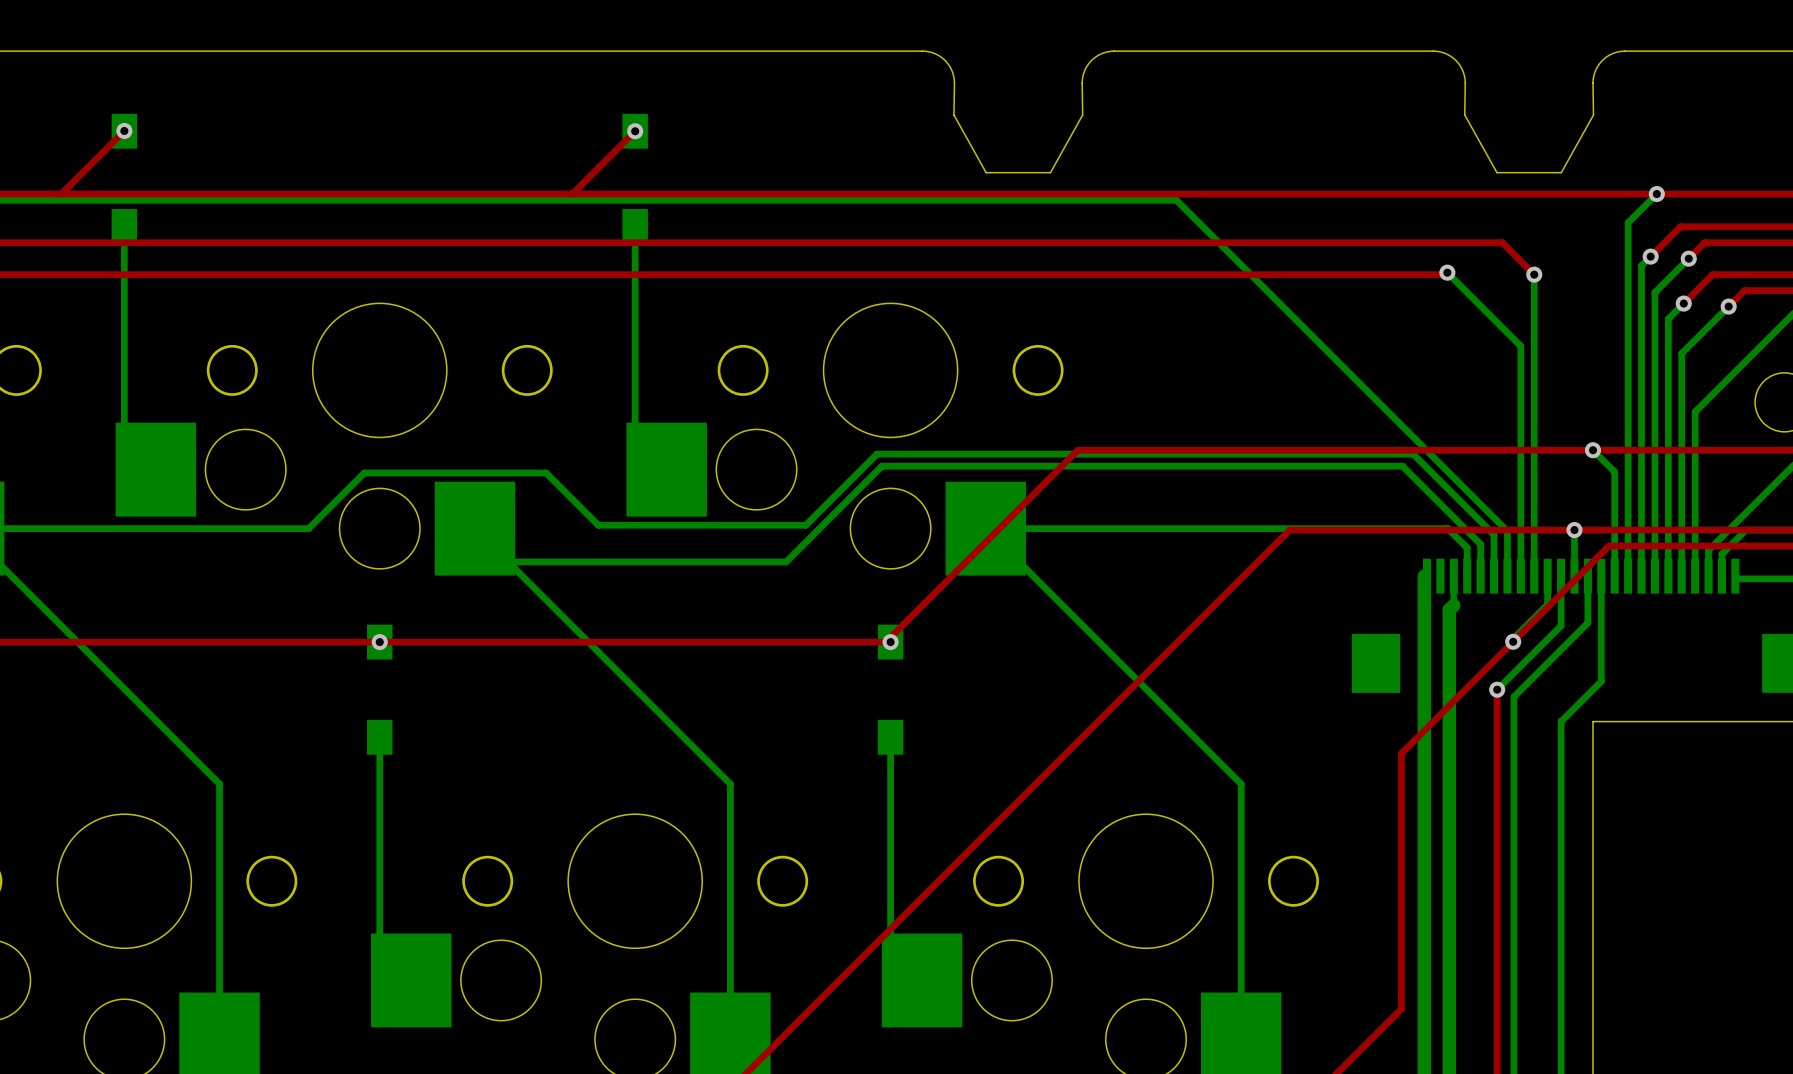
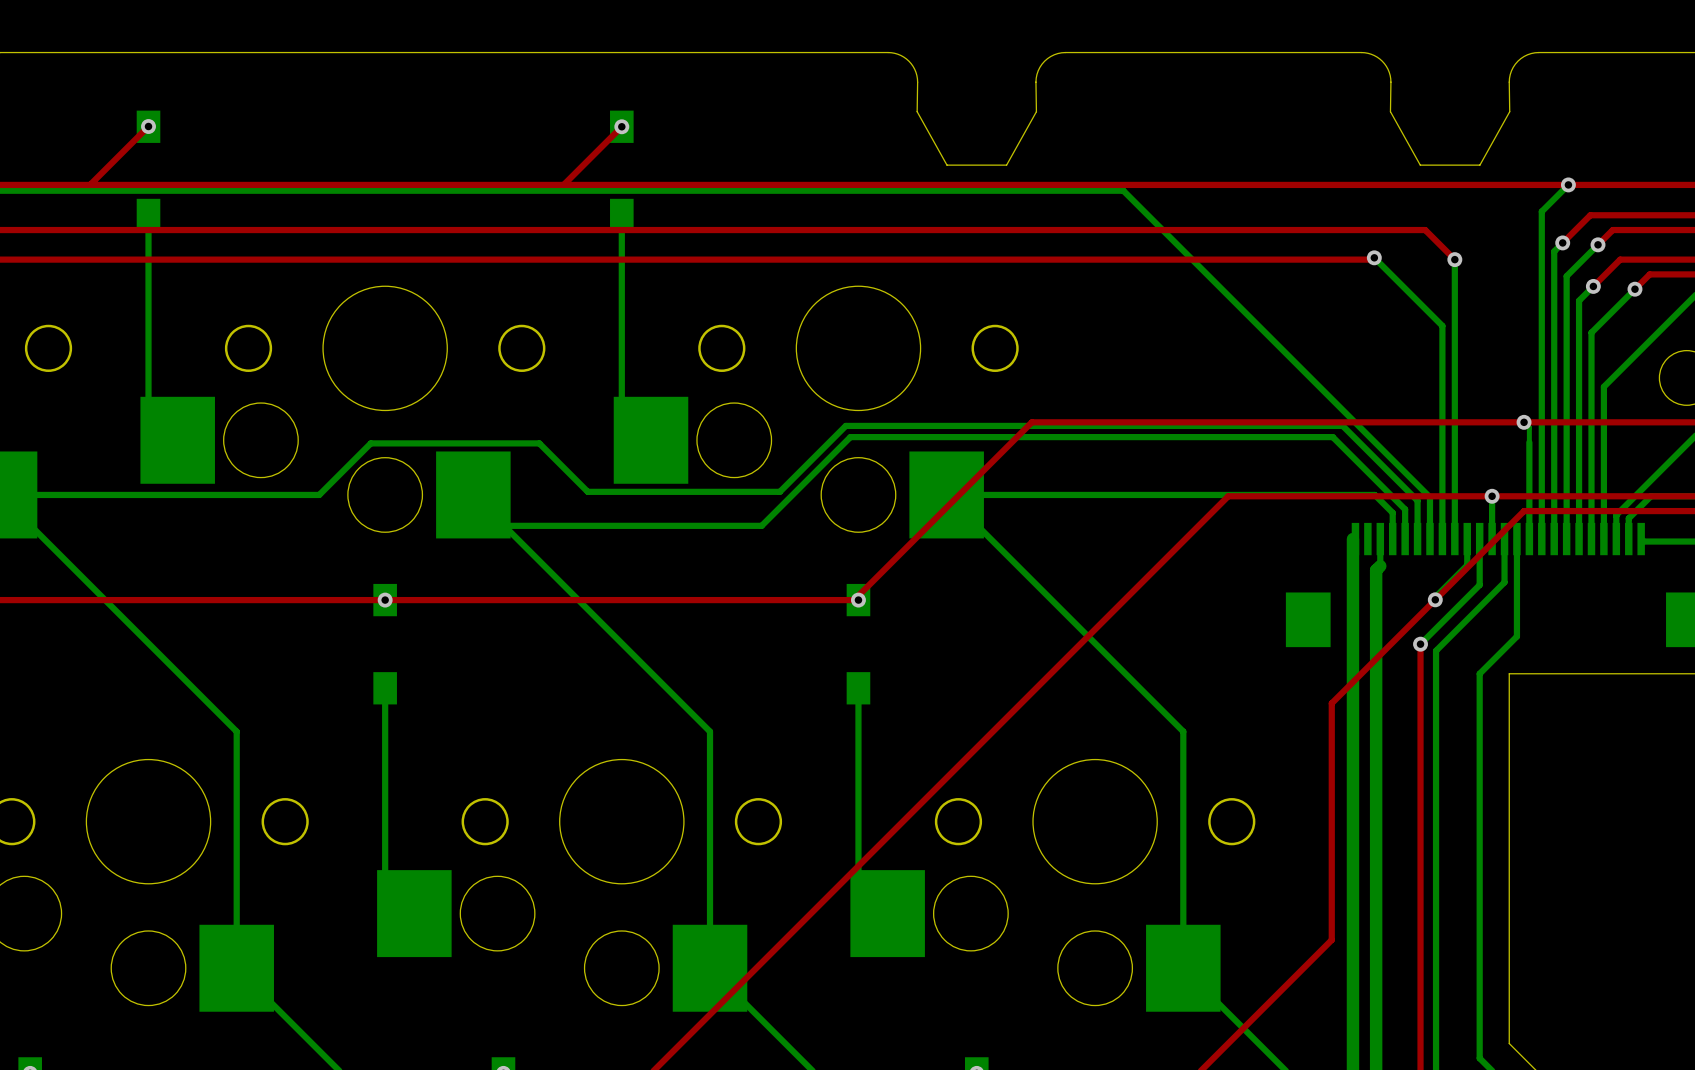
bottom track: (1592, 450) (1614, 471) -> (1524, 422) (1529, 427) (1529, 442)
via position: (1592, 450) -> (1524, 422)

